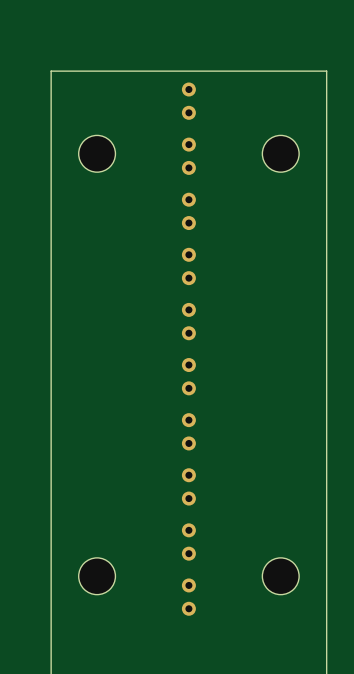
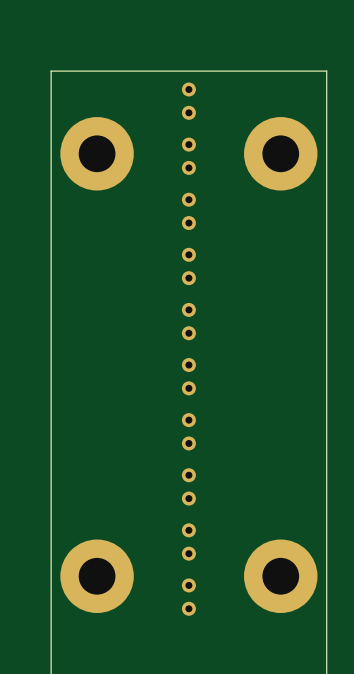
part footprint: [78, 135, 116, 173] -> [60, 117, 134, 191]
part footprint: [262, 135, 300, 173] -> [244, 117, 318, 191]
part footprint: [78, 557, 116, 595] -> [60, 539, 134, 614]
part footprint: [262, 557, 300, 595] -> [244, 539, 318, 614]

